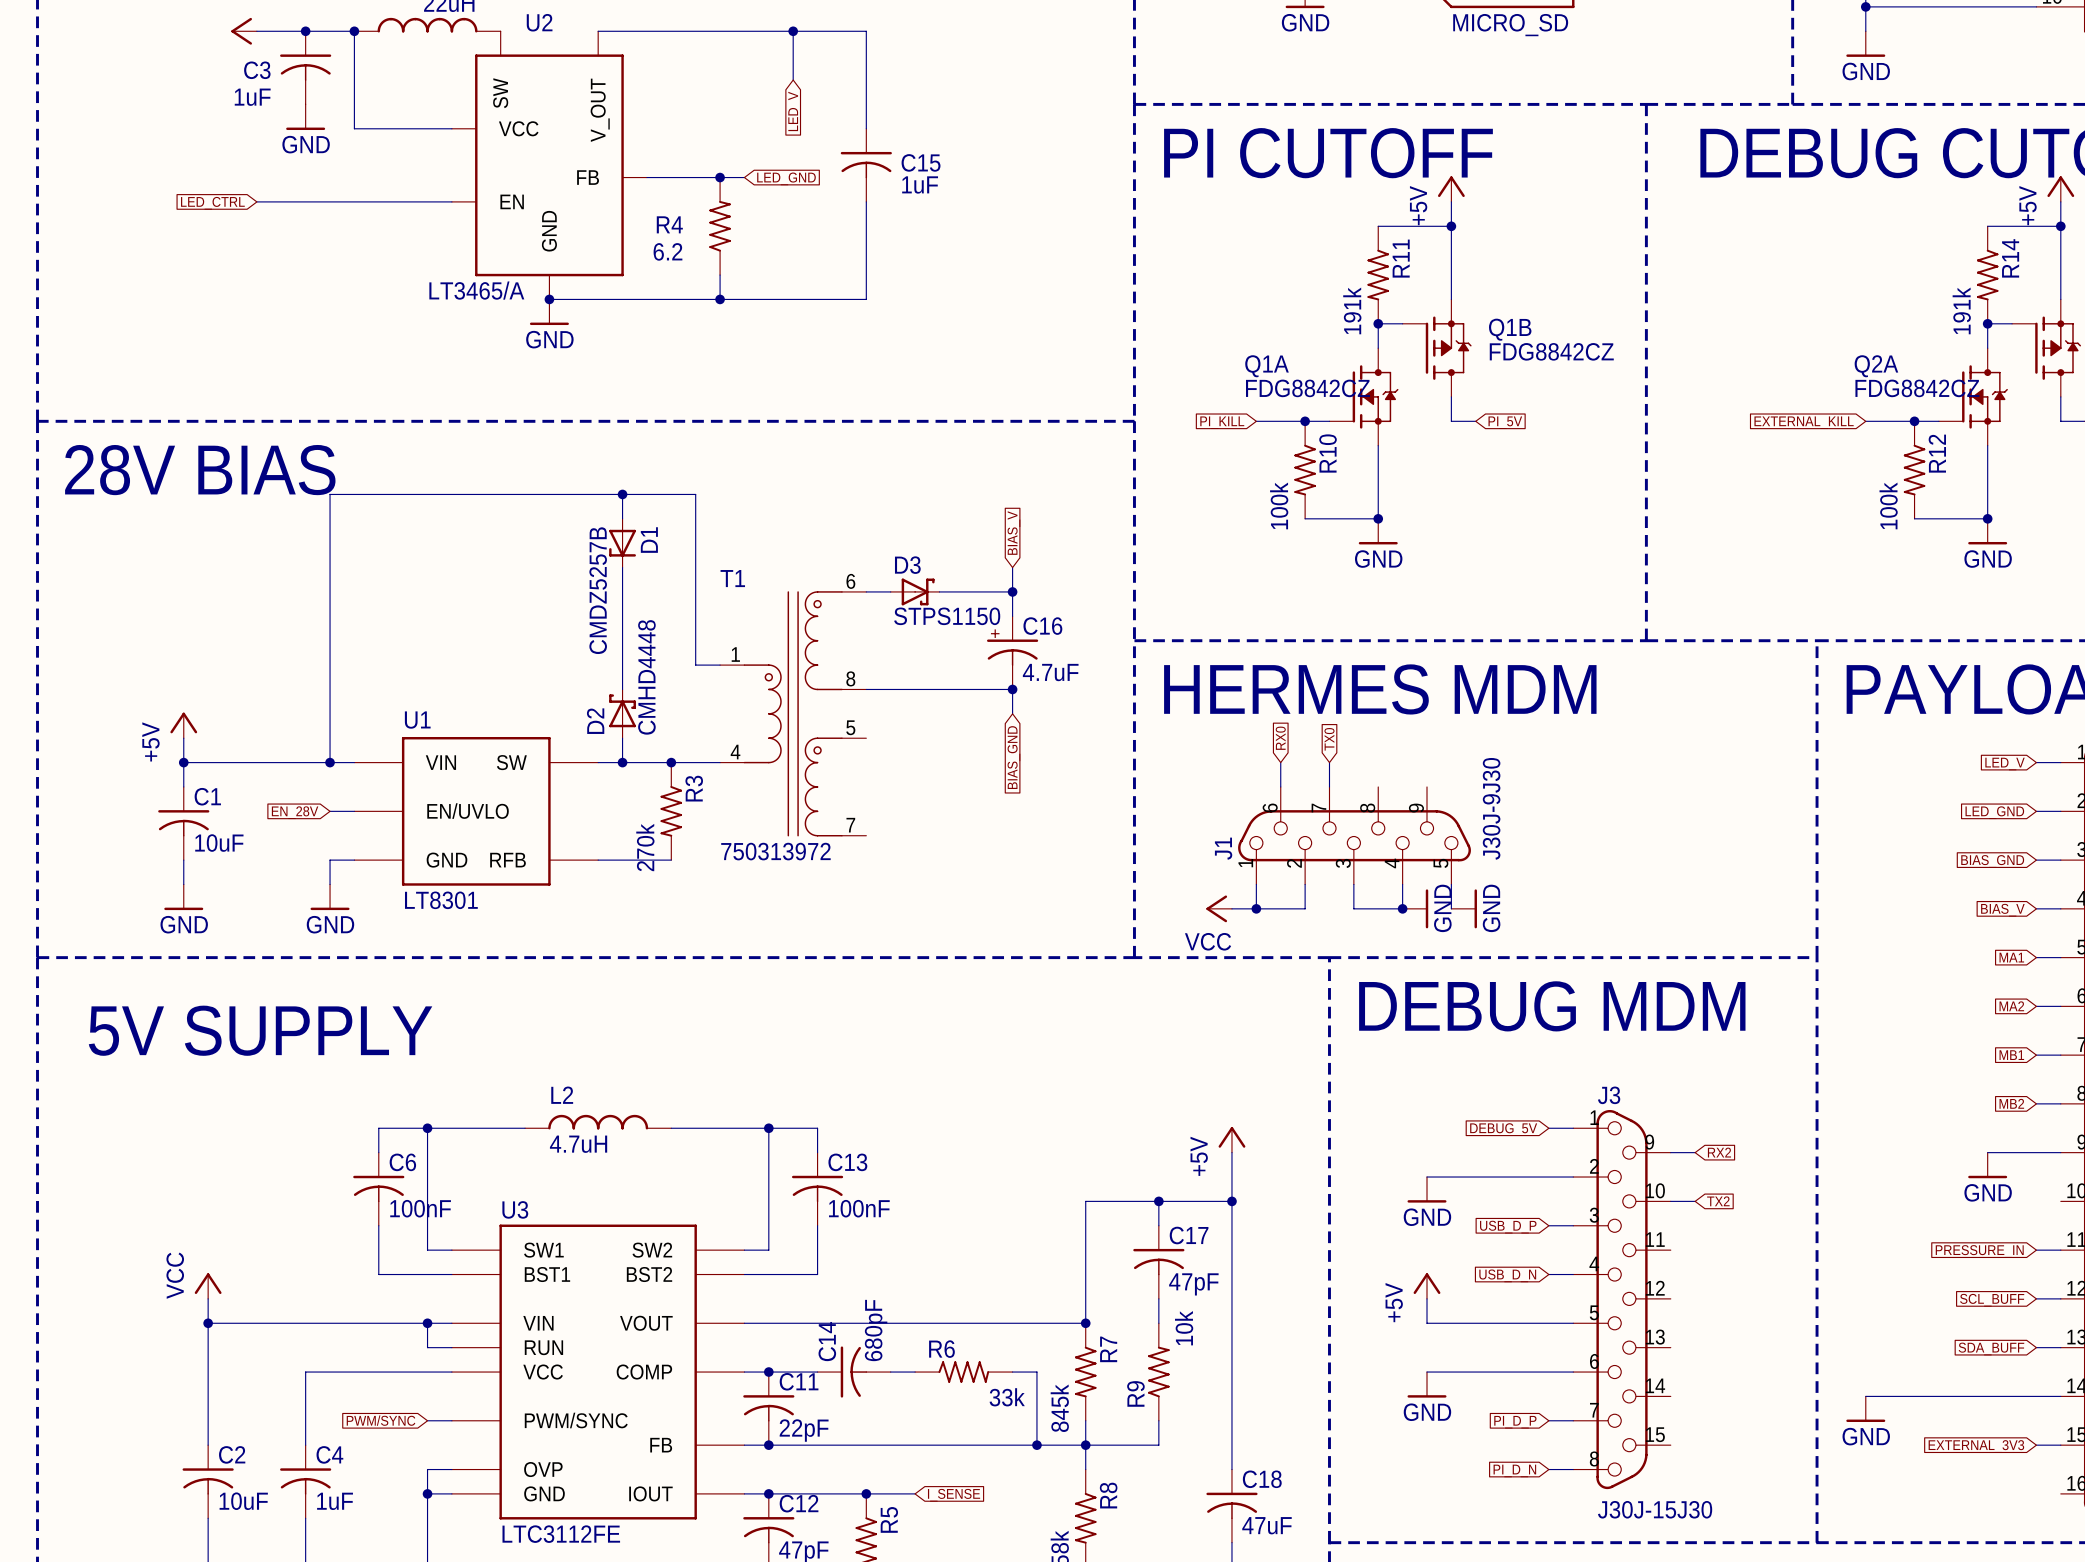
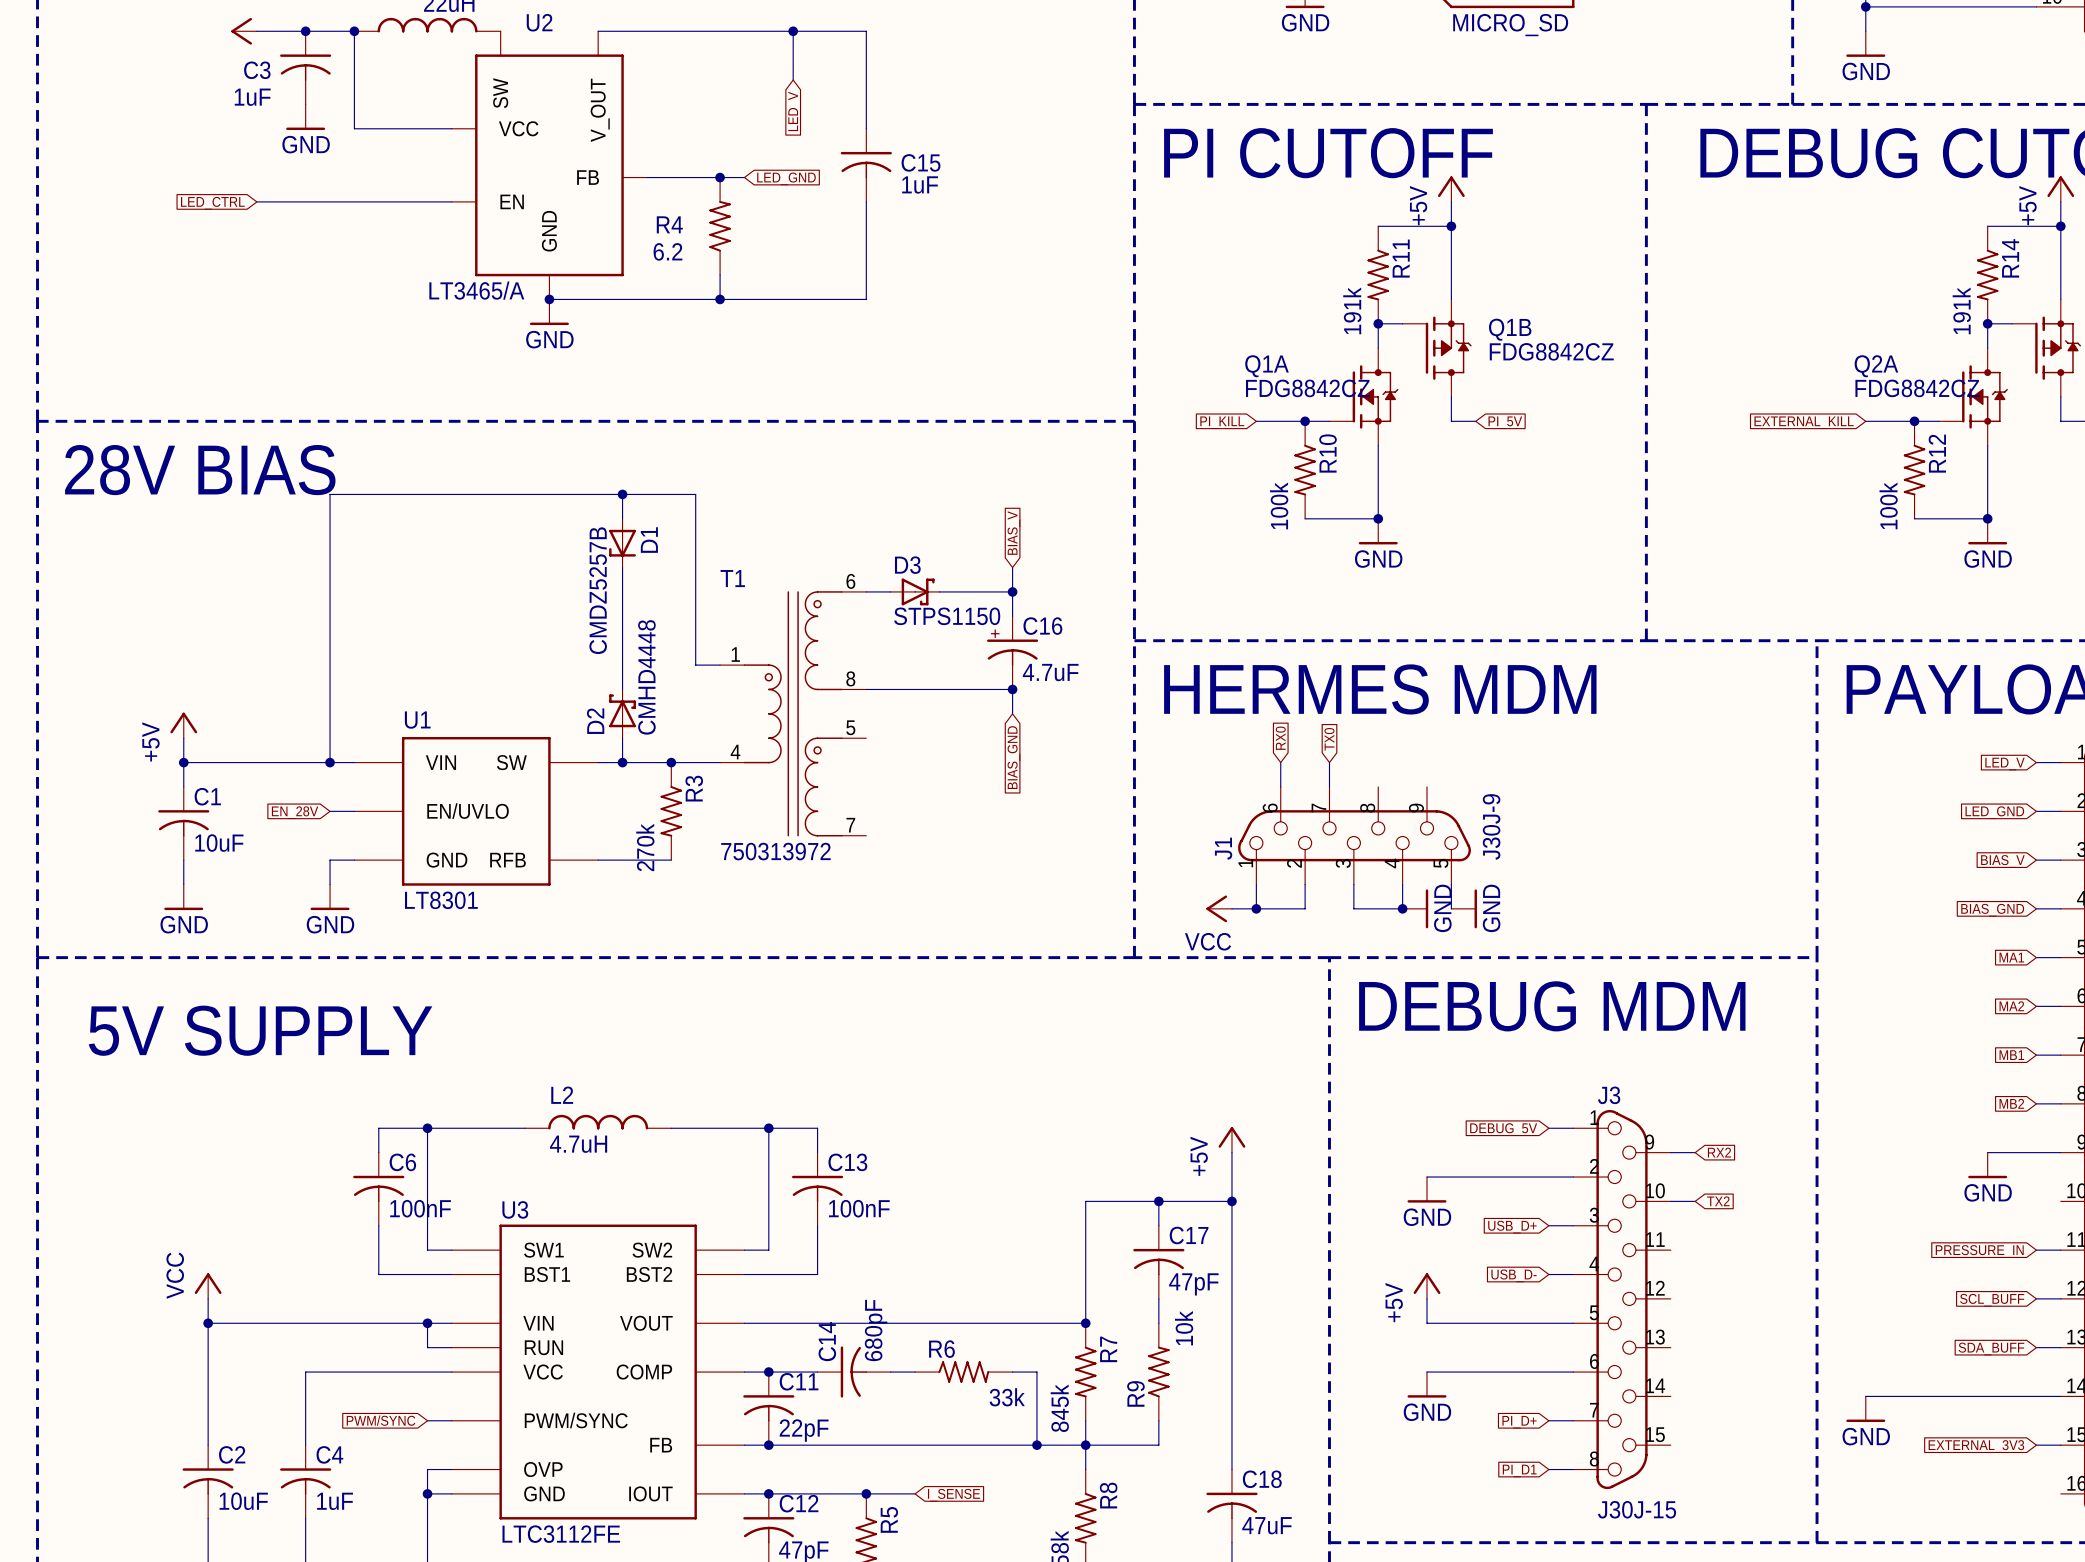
J1 value: J30J-9J30 (1491, 808) -> J30J-9 (1491, 826)
global label: BIAS_GND (1992, 861) -> BIAS_V (2002, 861)
global label: BIAS_V (2002, 910) -> BIAS_GND (1992, 910)
global label: USB_D_P (1508, 1227) -> USB_D+ (1512, 1227)
global label: USB_D_N (1507, 1275) -> USB_D- (1514, 1275)
global label: PI_D_P (1515, 1422) -> PI_D+ (1519, 1422)
global label: PI_D_N (1514, 1470) -> PI_D1 (1519, 1470)
J3 value: J30J-15J30 (1655, 1509) -> J30J-15 (1637, 1509)

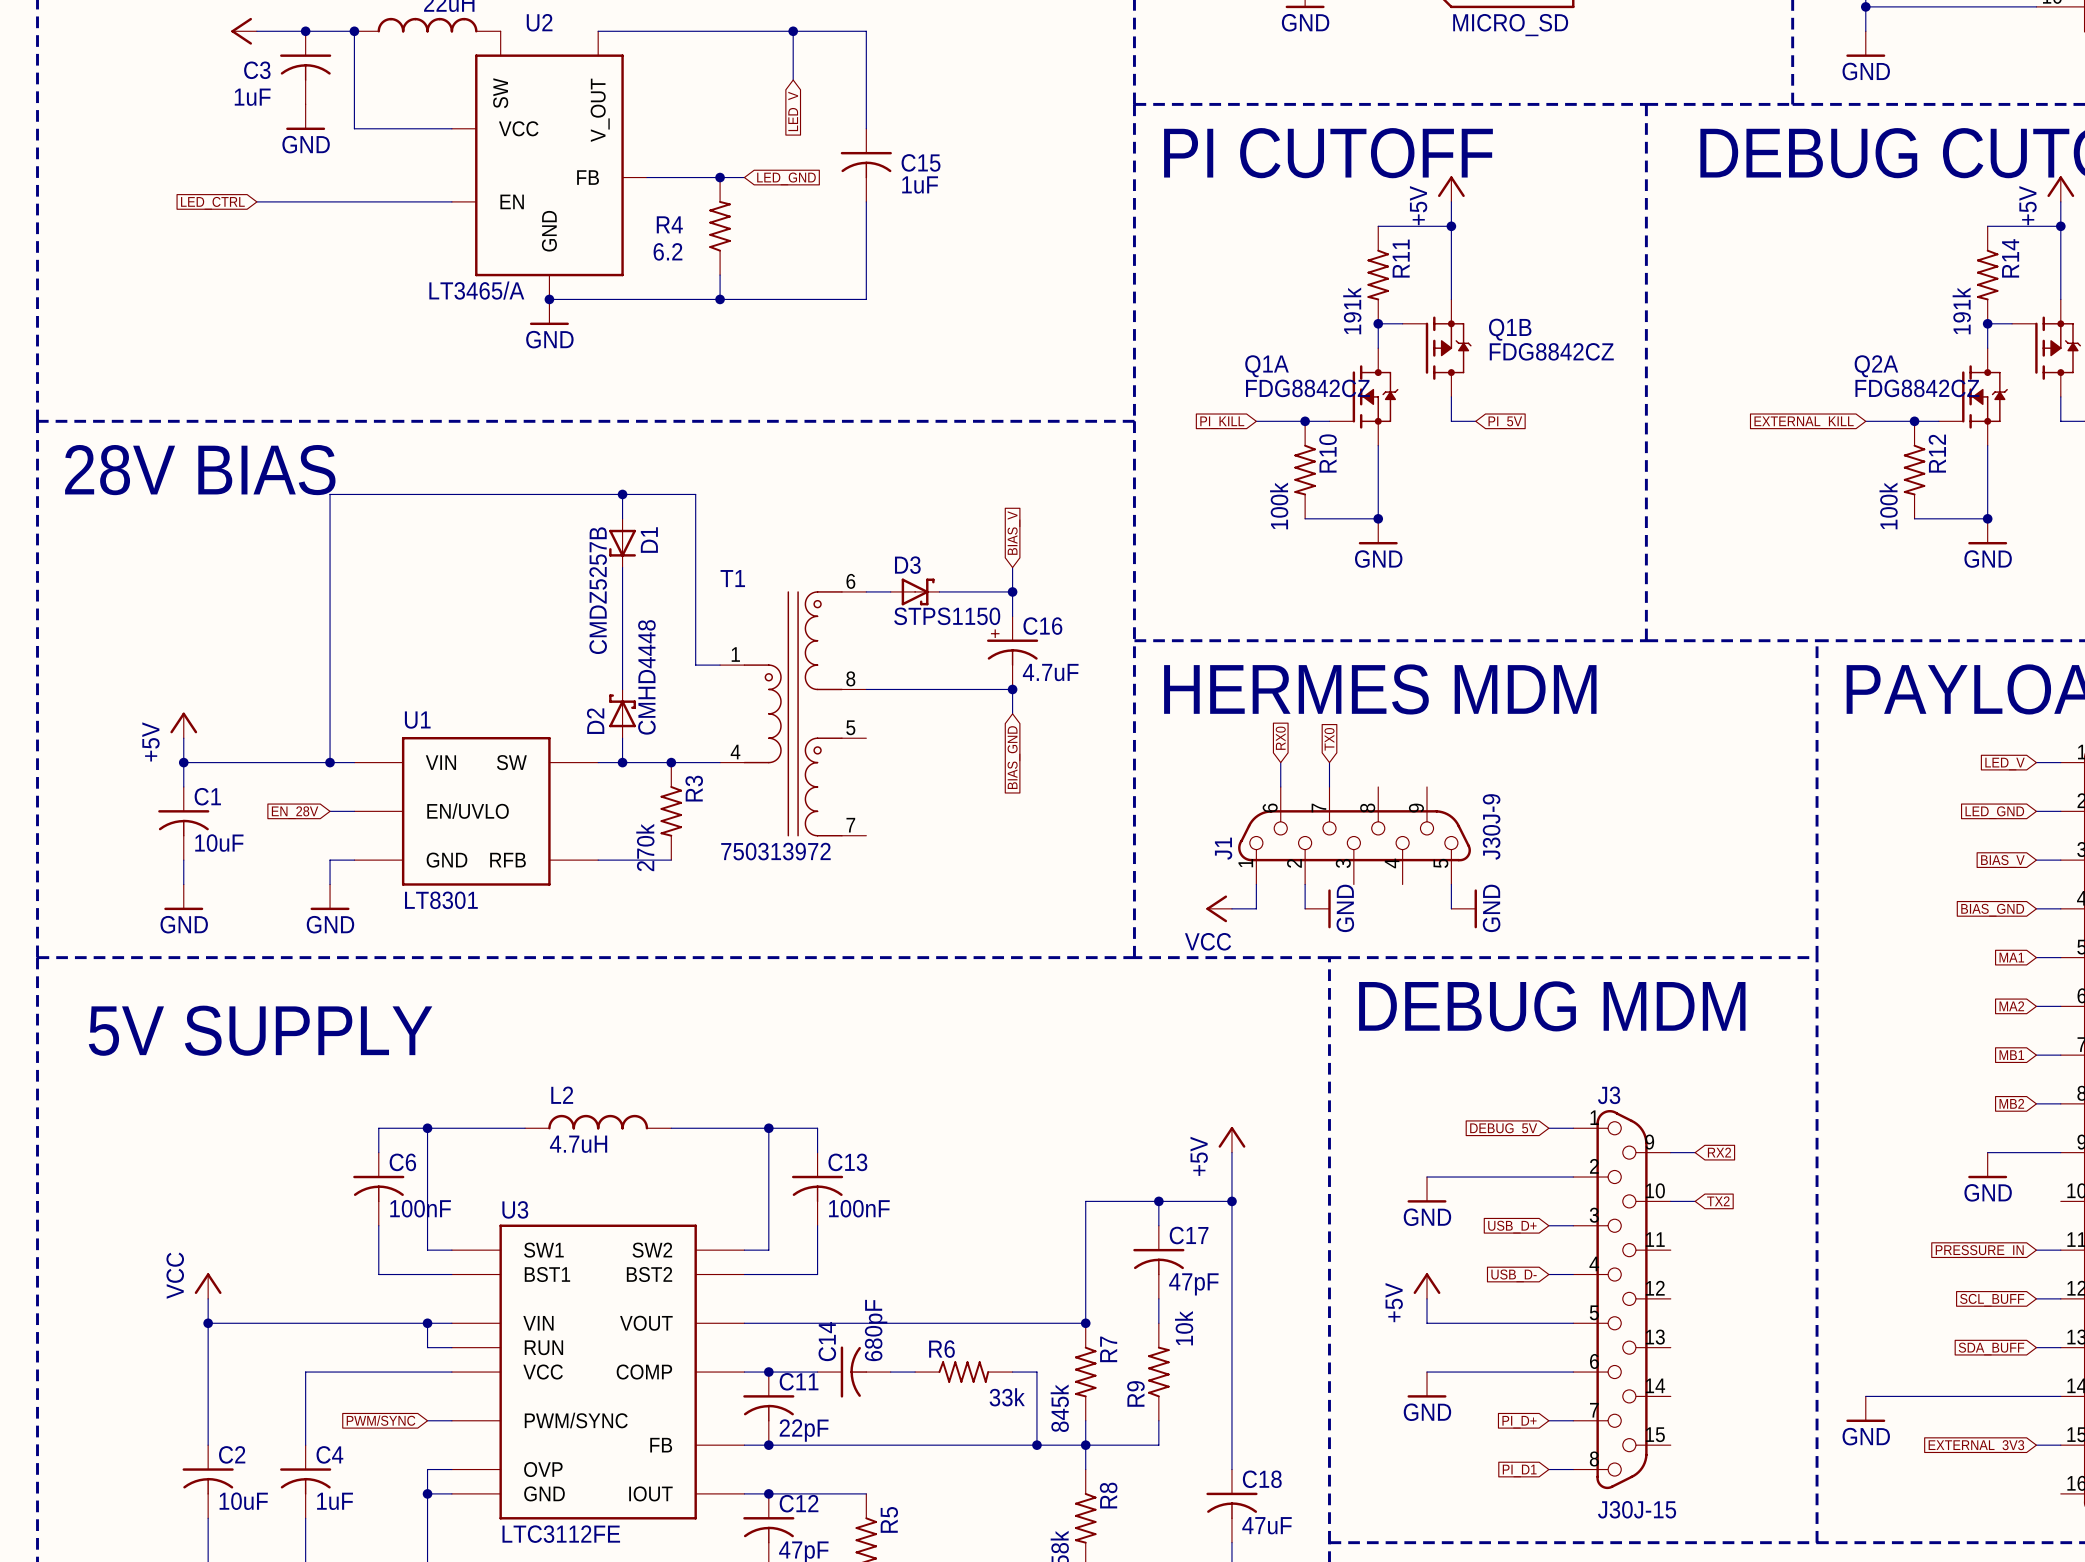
wire: (1353, 884) (1353, 908) (1402, 908) (1402, 884) -> none
wire: (1256, 908) (1305, 908) -> none
junction: (1256, 908) -> none
junction: (1402, 908) -> none
power symbol position: GND (1415, 908) -> GND (1317, 908)
wire: (866, 1493) (915, 1493) -> none
junction: (866, 1493) -> none
global label: I_SENSE (954, 1495) -> none

